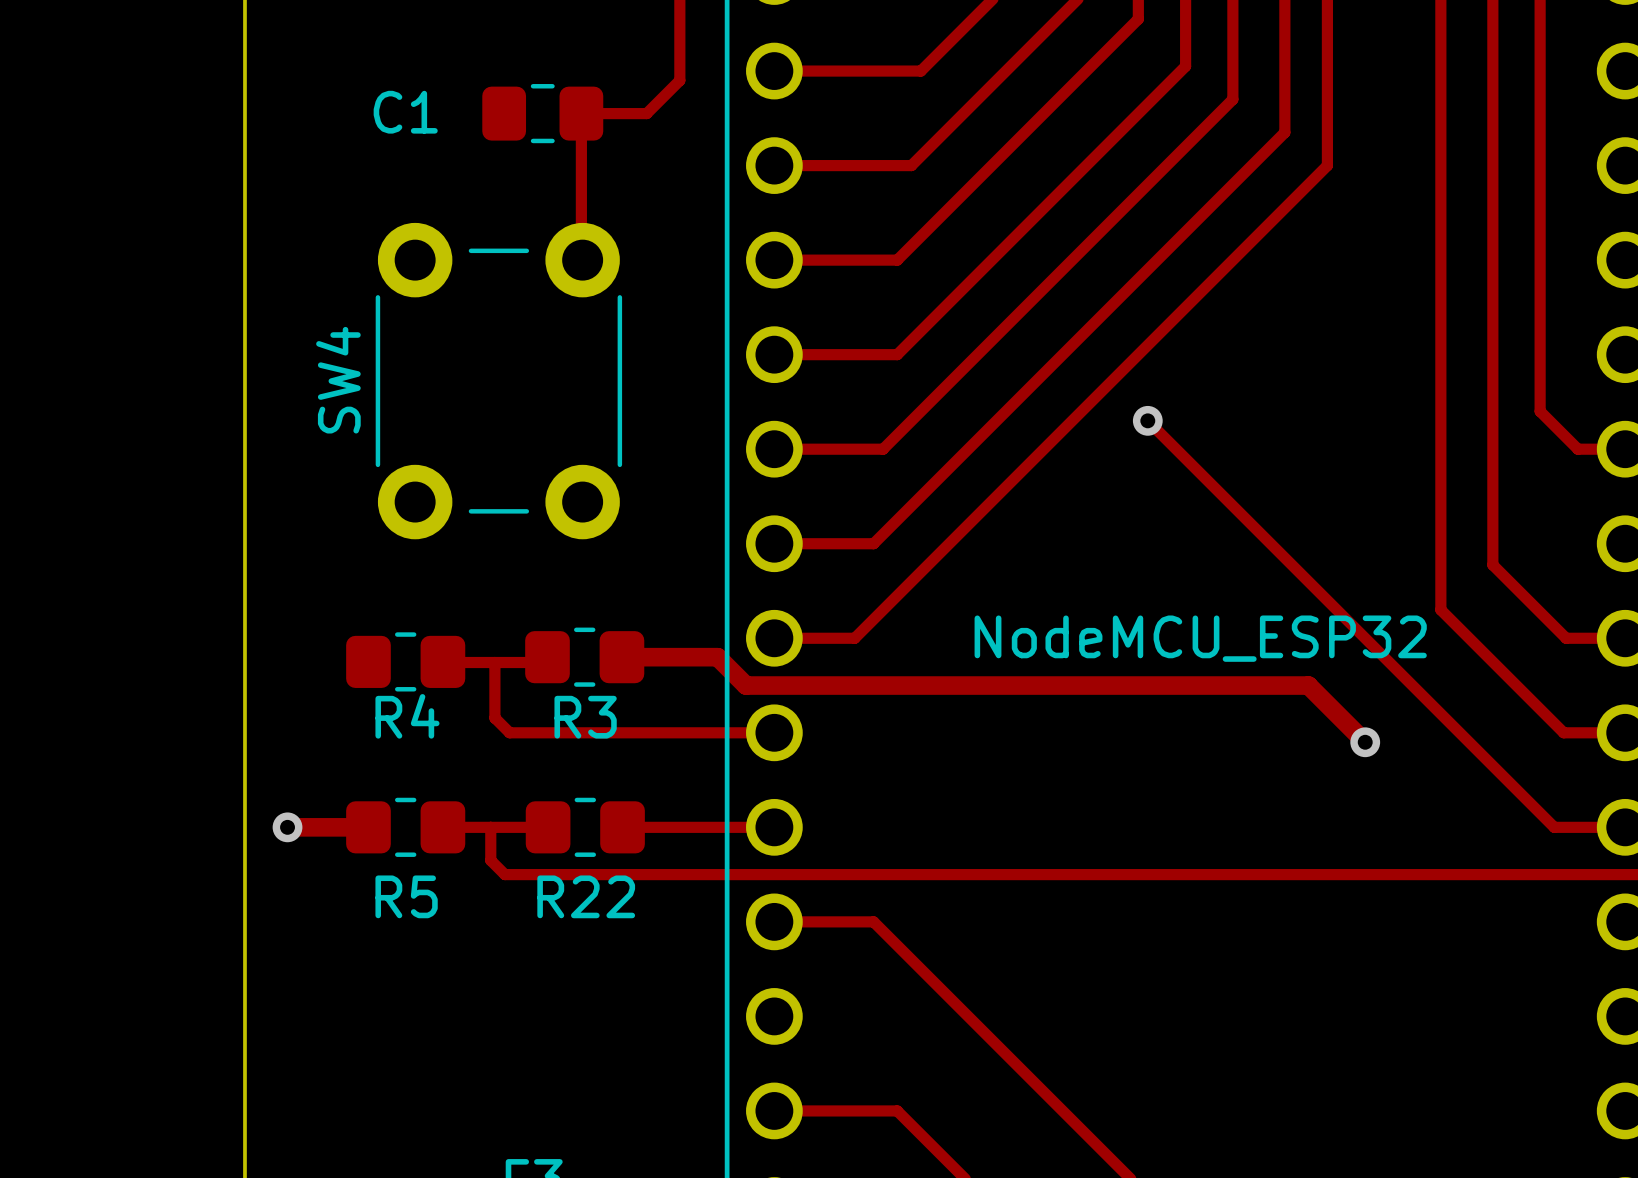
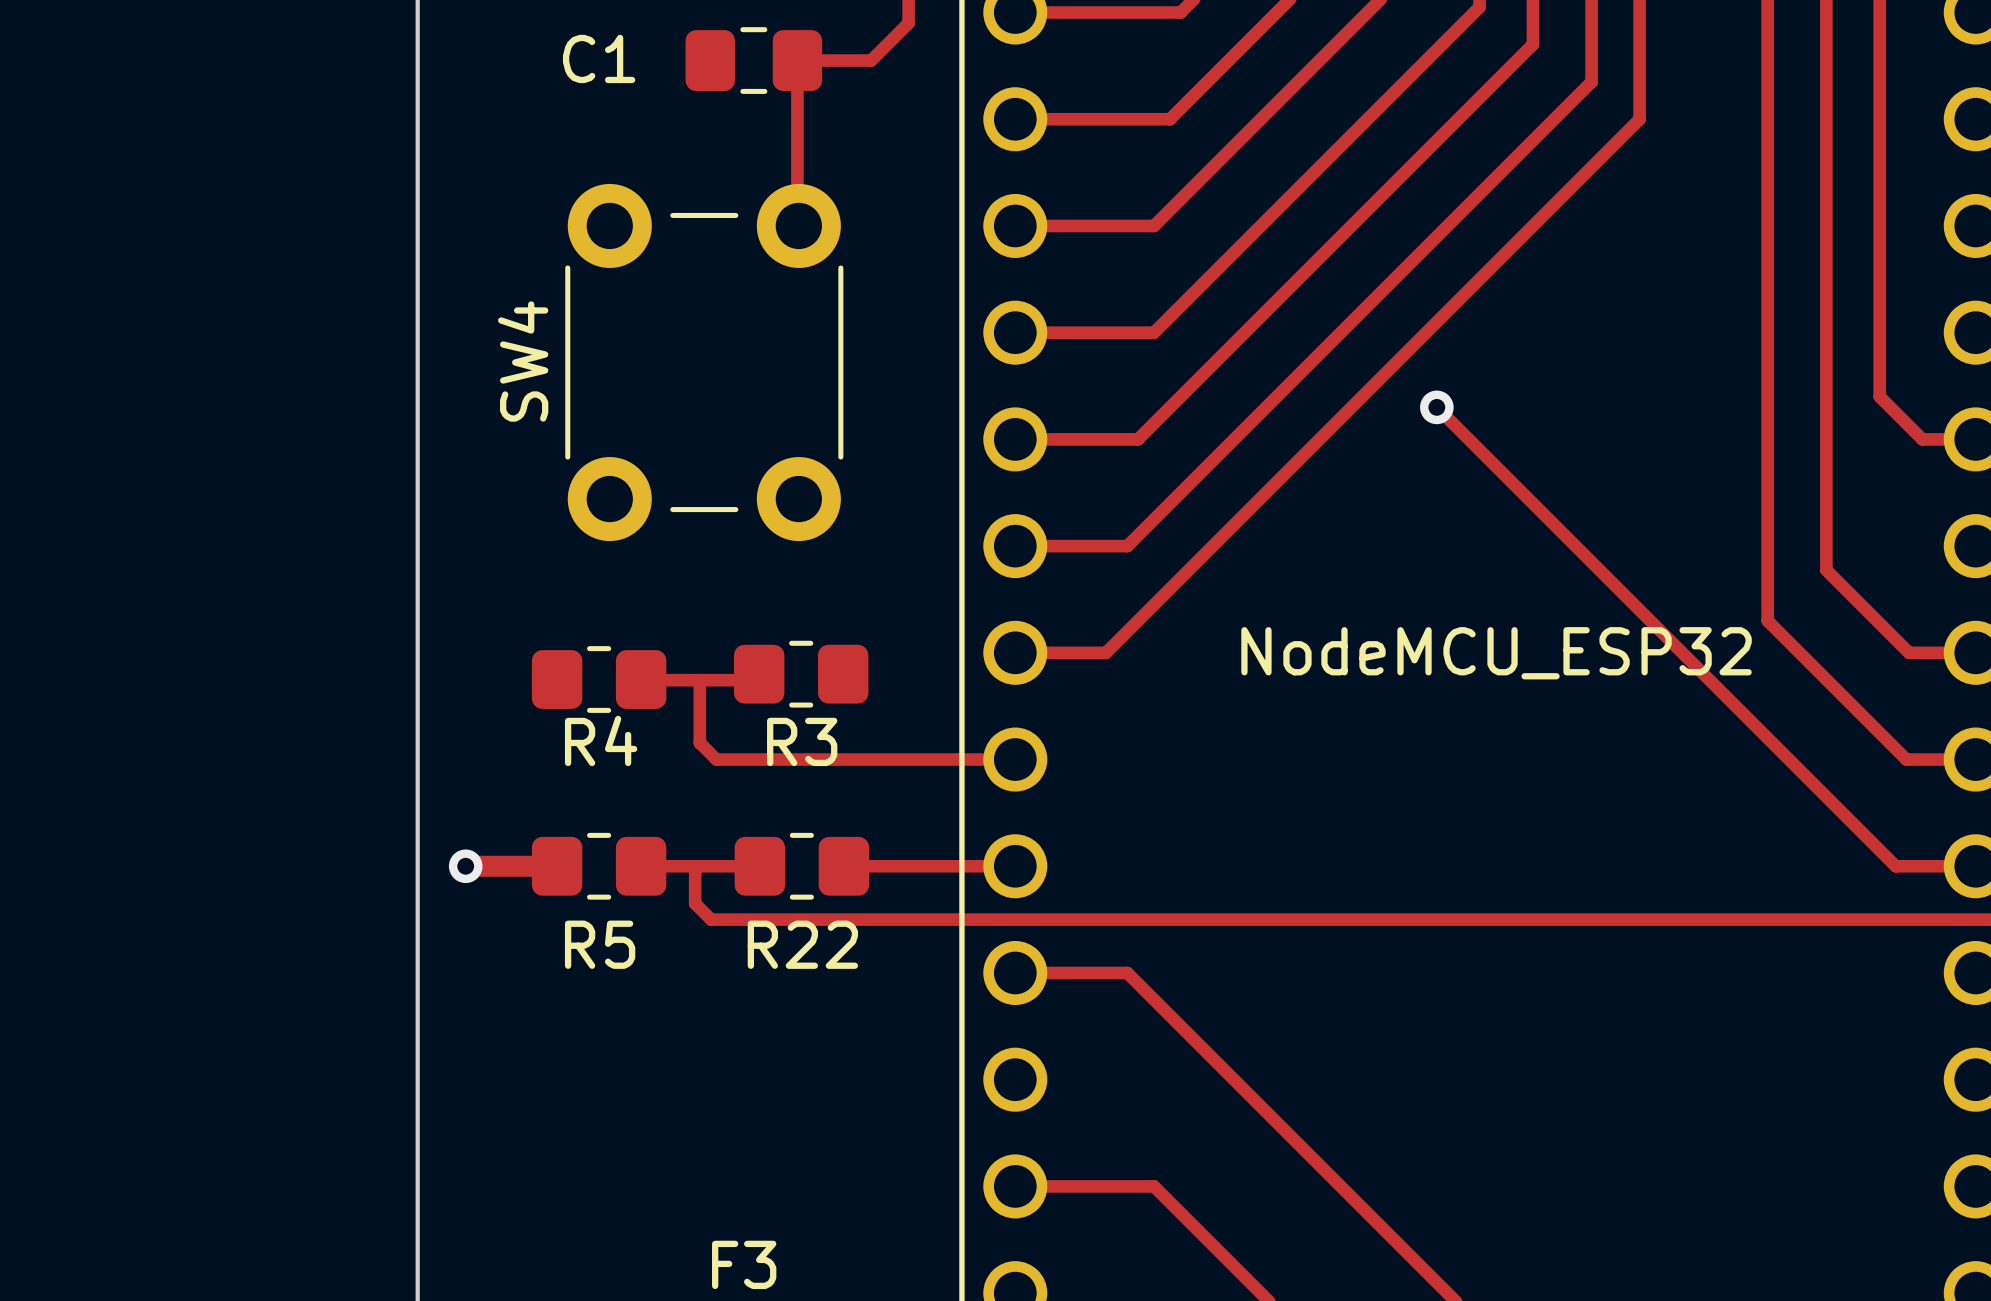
track: (621, 657) (717, 657) (746, 685) (1308, 685) (1365, 742) -> none
via: (1365, 742) -> none

